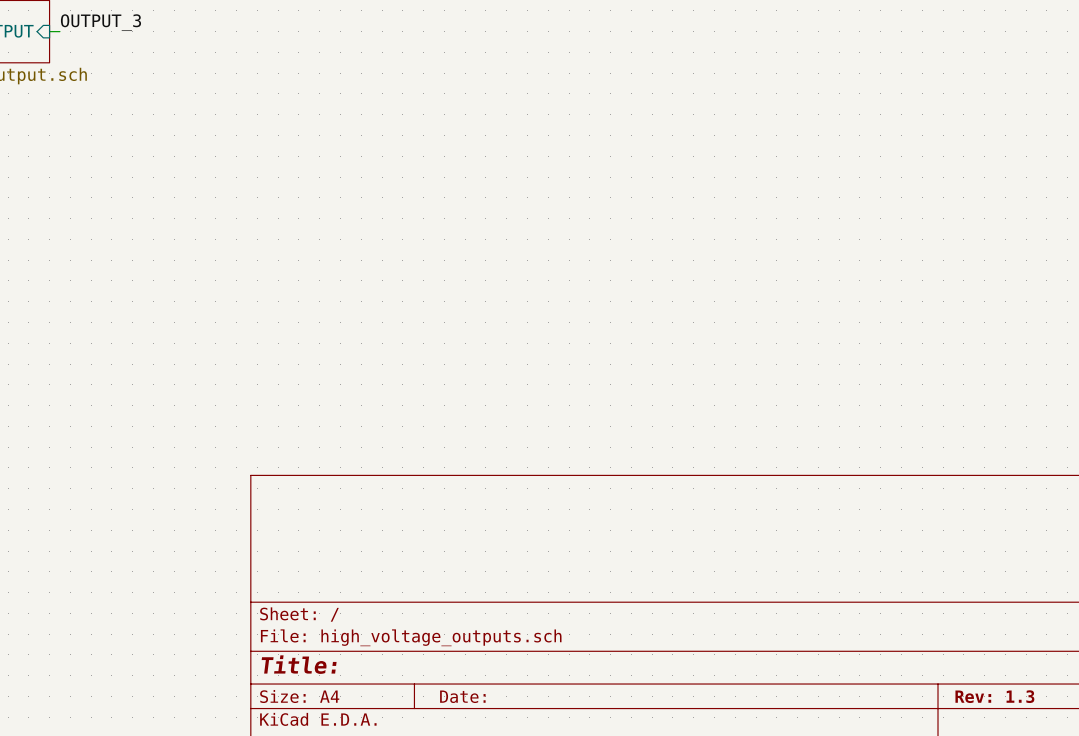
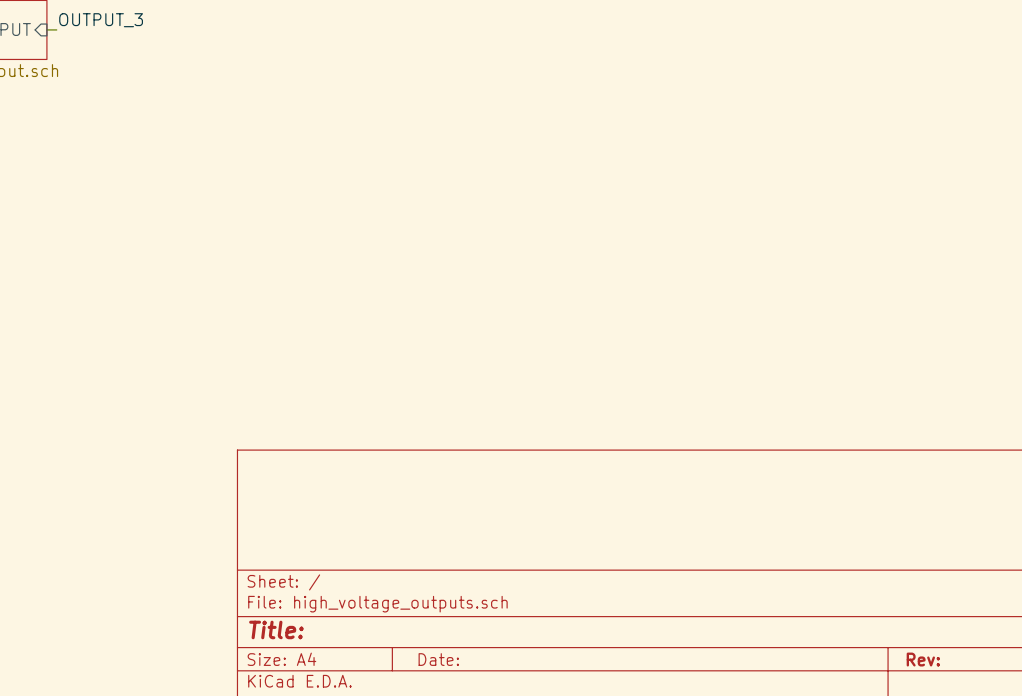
title block: Rev: 1.3 (994, 696) -> Rev: (923, 659)

